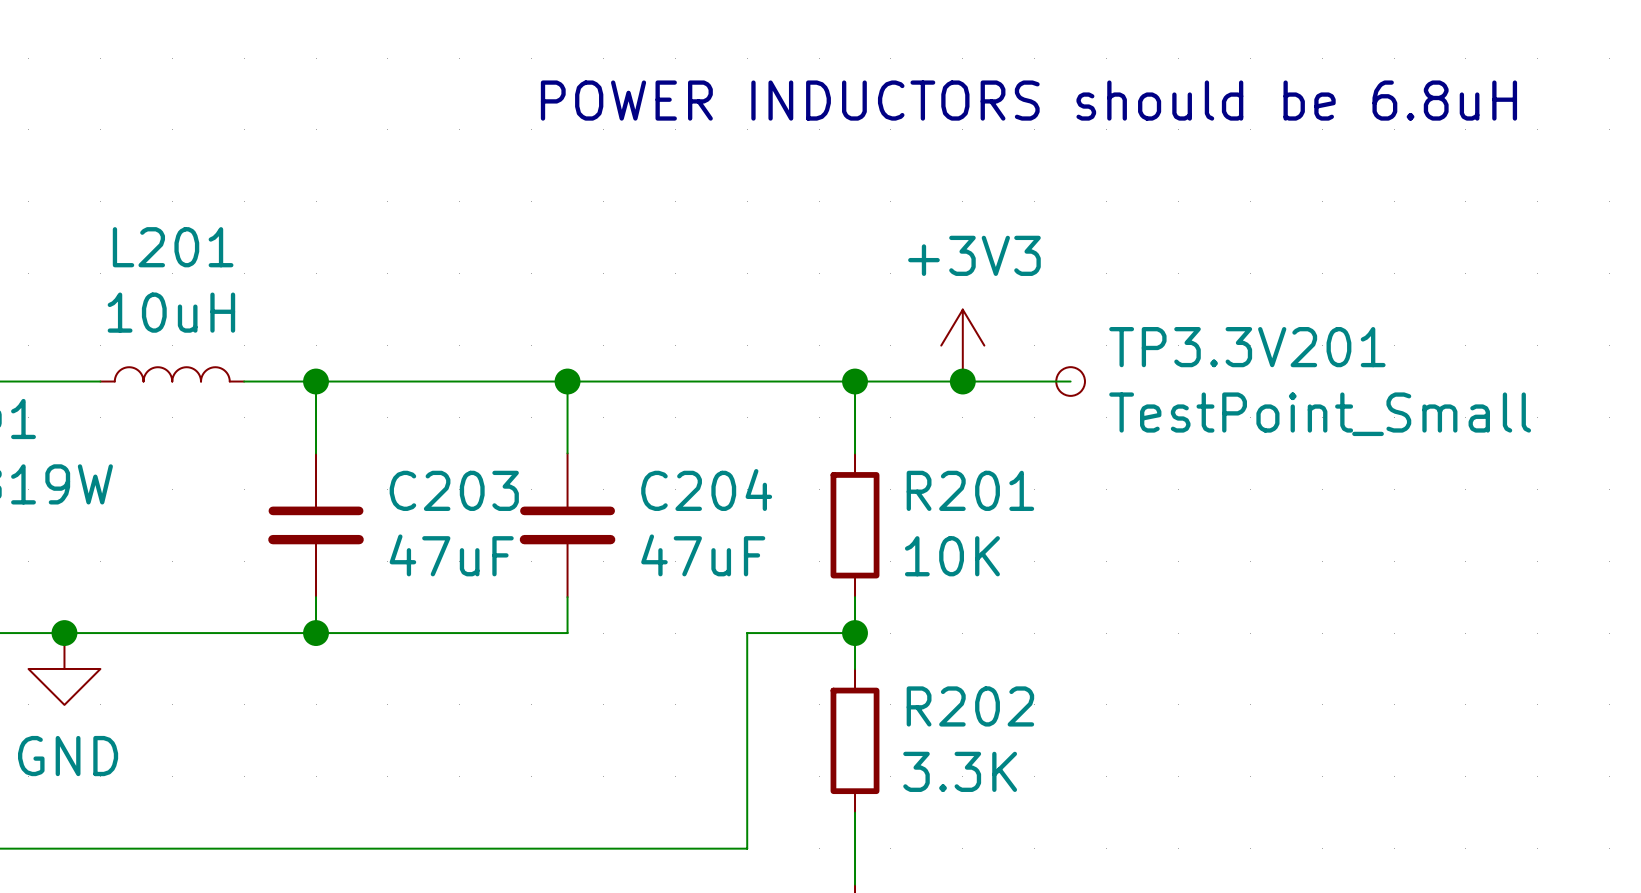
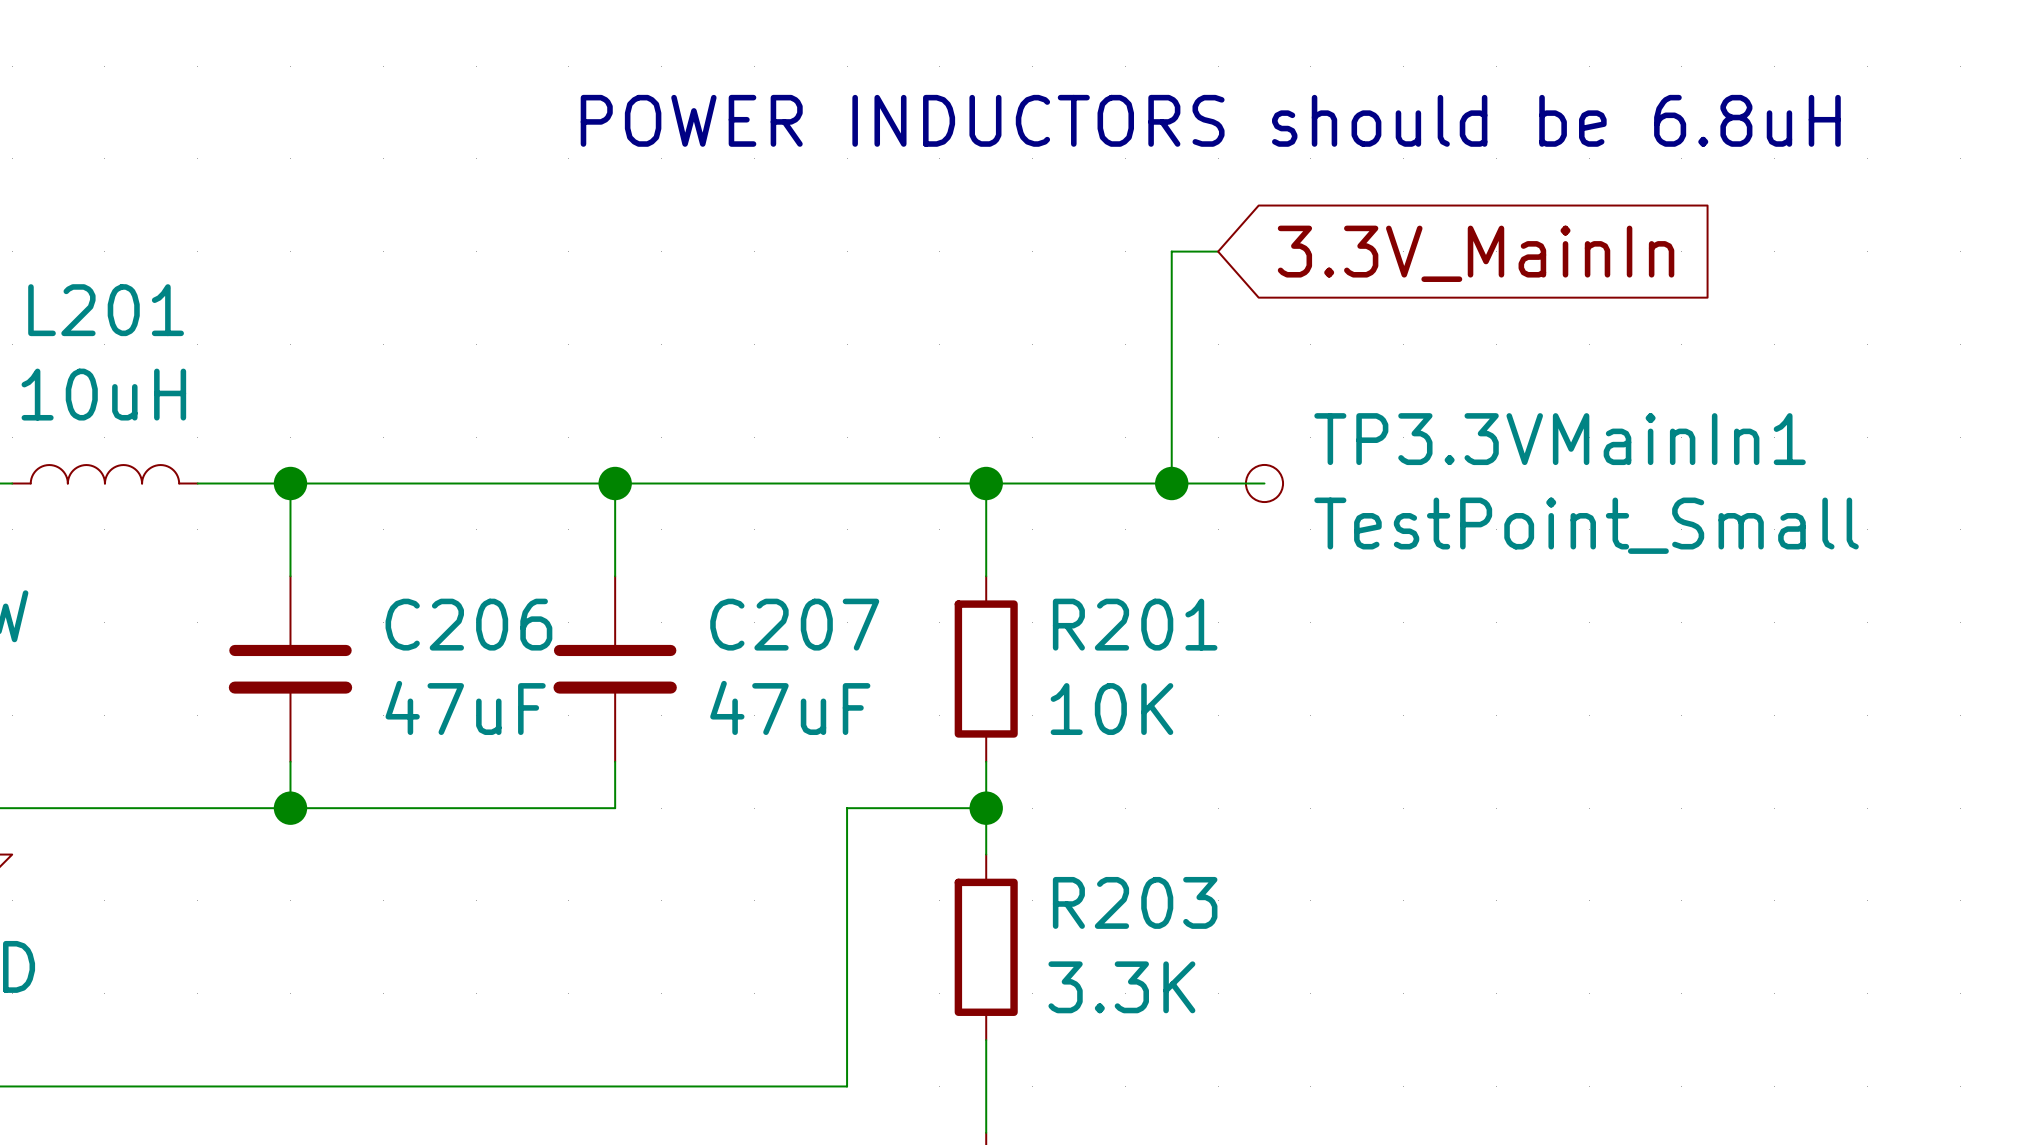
wire: none -> (1218, 251) (1171, 251) (1171, 483)
global label: none -> 3.3V_MainIn (1476, 253)
power symbol: +3V3 (962, 345) -> none
TP3.3V201 name: TP3.3V201 (1247, 347) -> TP3.3VMainIn1 (1560, 439)
junction position: (962, 381) -> (1171, 483)
C203 name: C203 (454, 490) -> C206 (468, 624)
C204 name: C204 (706, 490) -> C207 (794, 624)
R202 name: R202 (970, 706) -> R203 (1135, 902)

